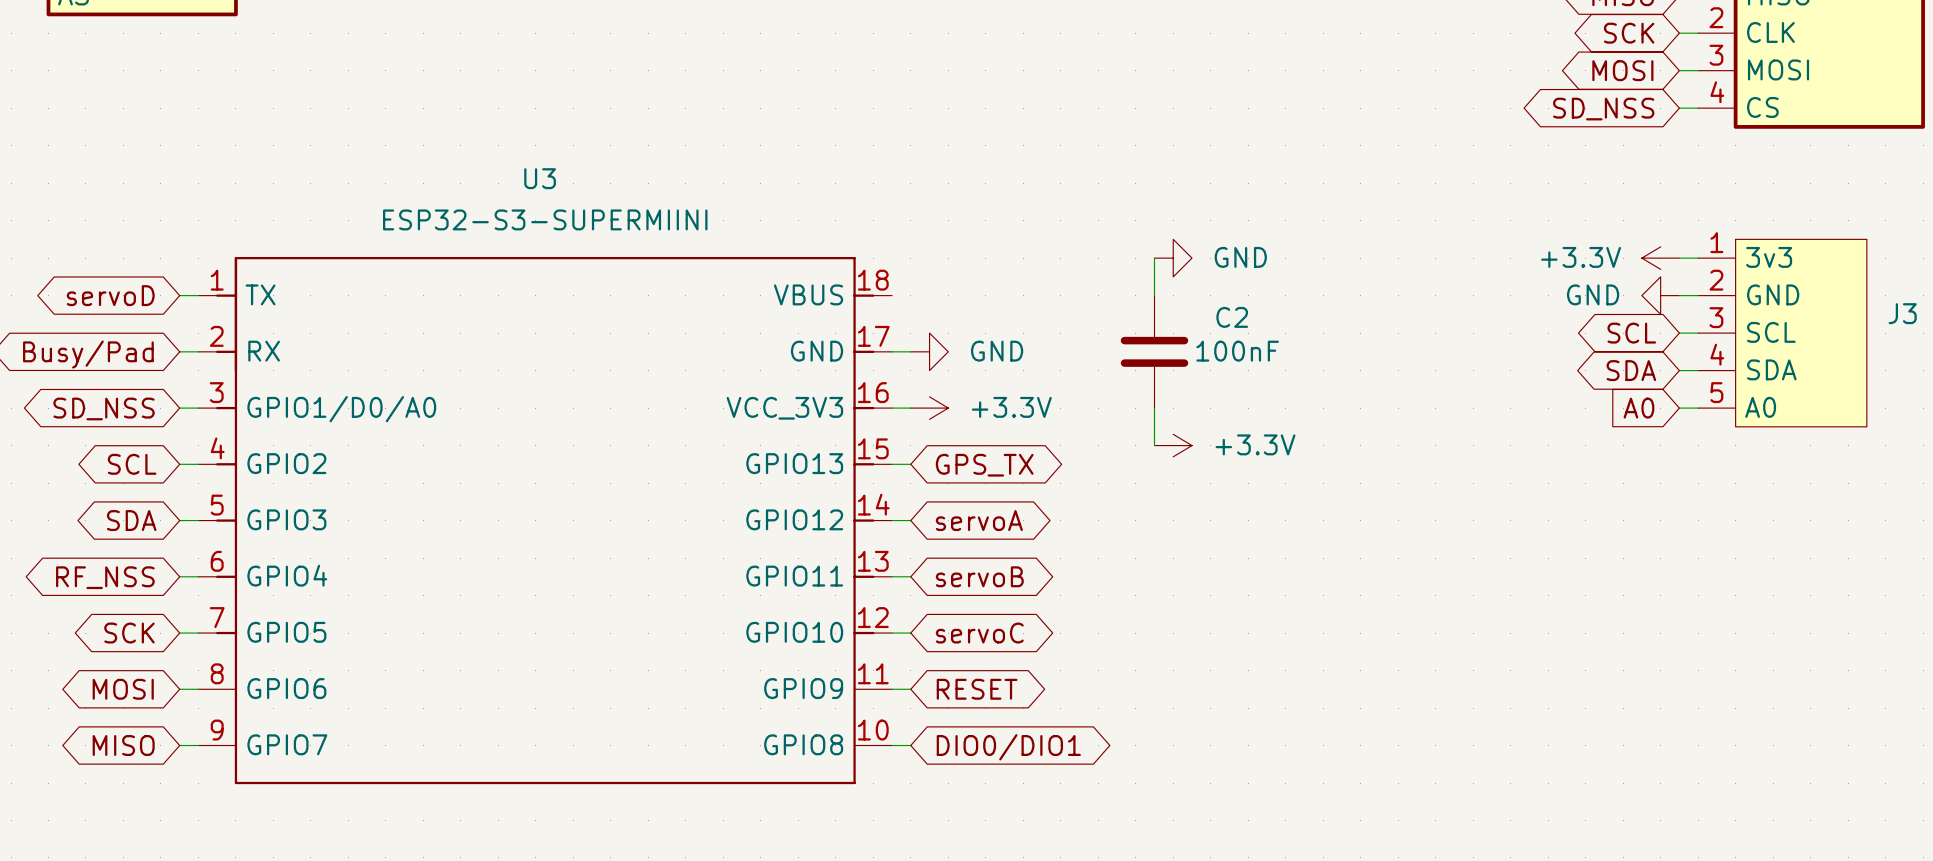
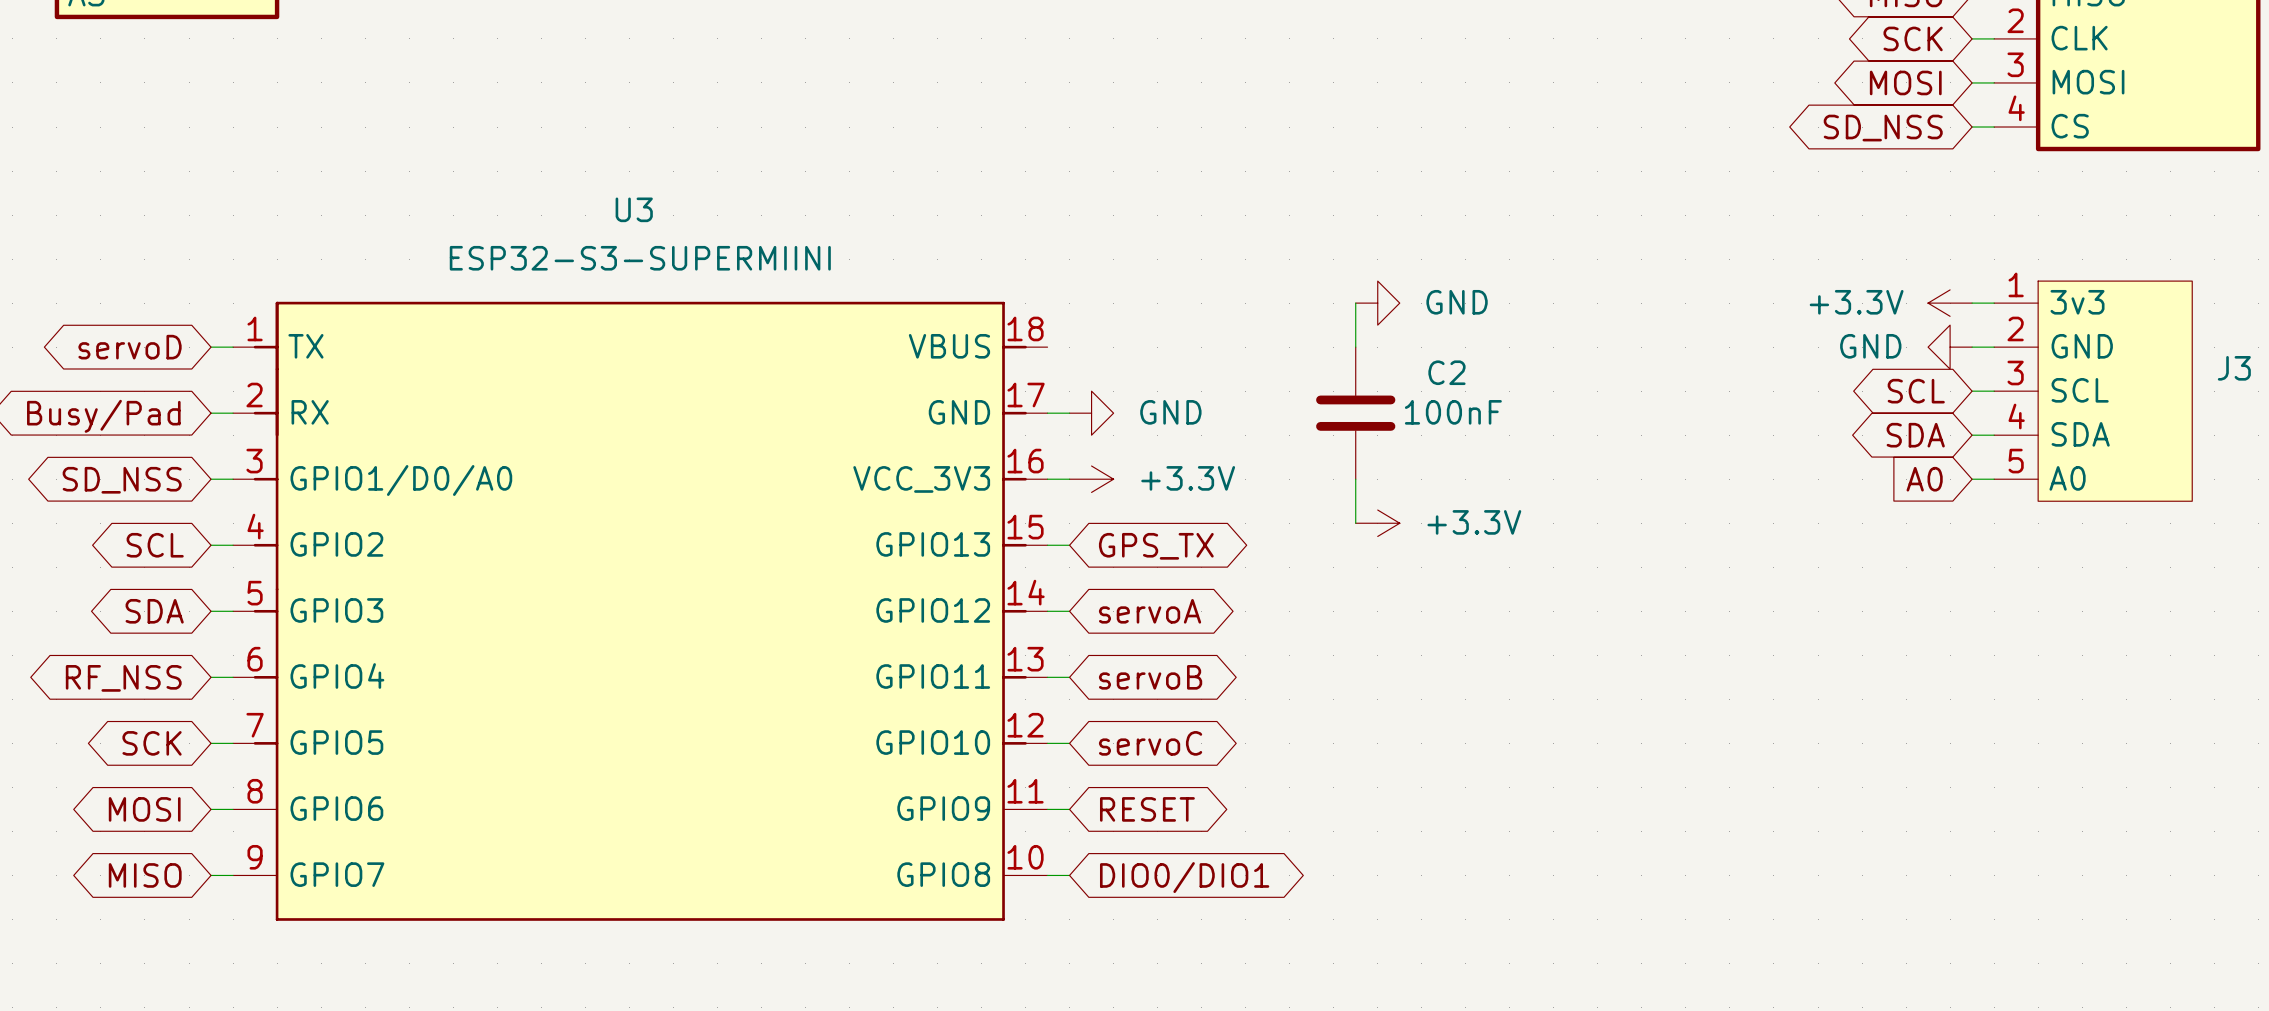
U3 symbol: [198, 256, 893, 785] -> [233, 301, 1048, 921]

